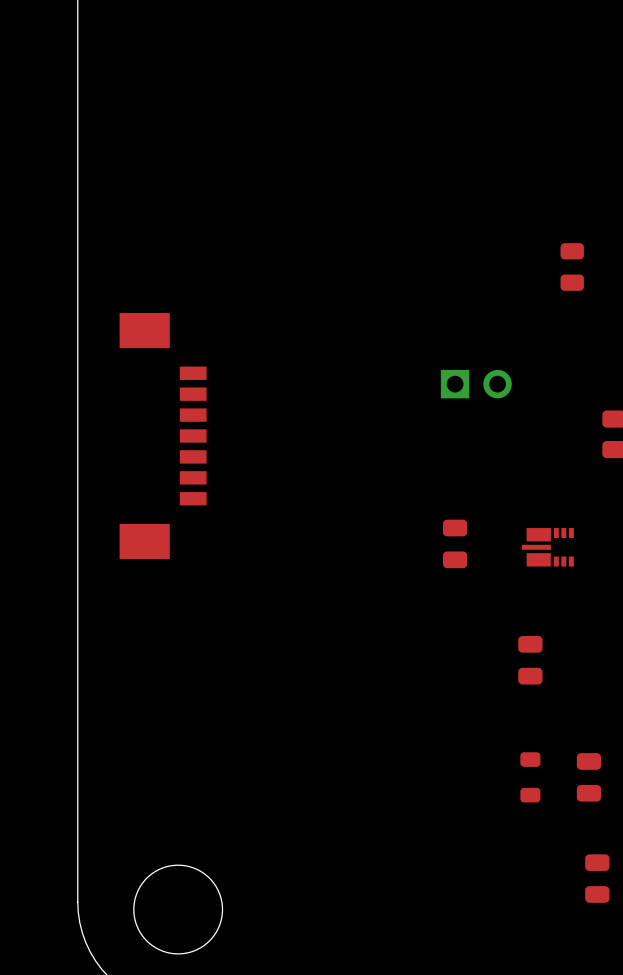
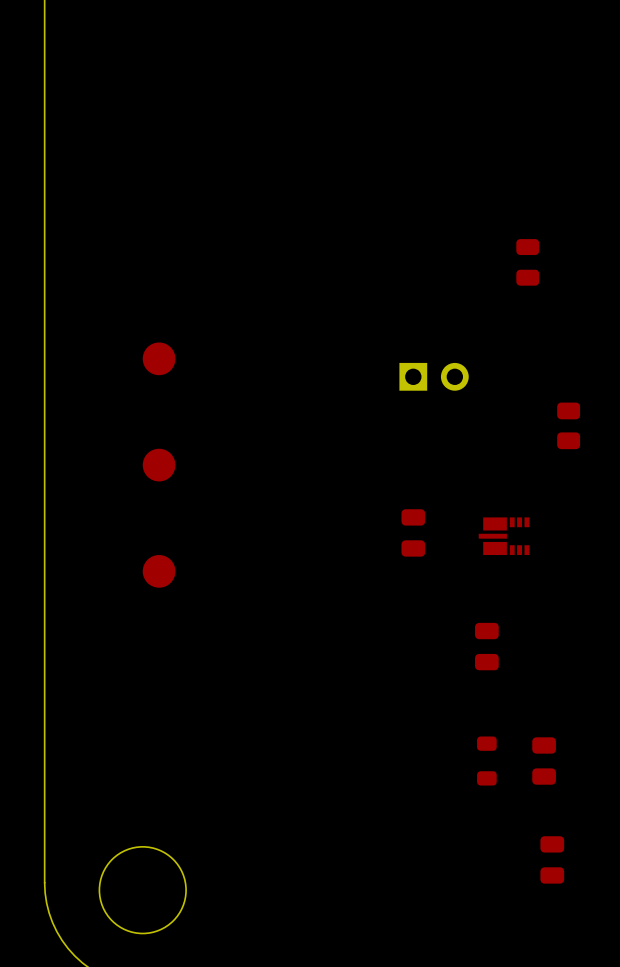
part: none -> (159, 358)
part: (163, 436) -> none
part: none -> (159, 465)
part: none -> (159, 571)

